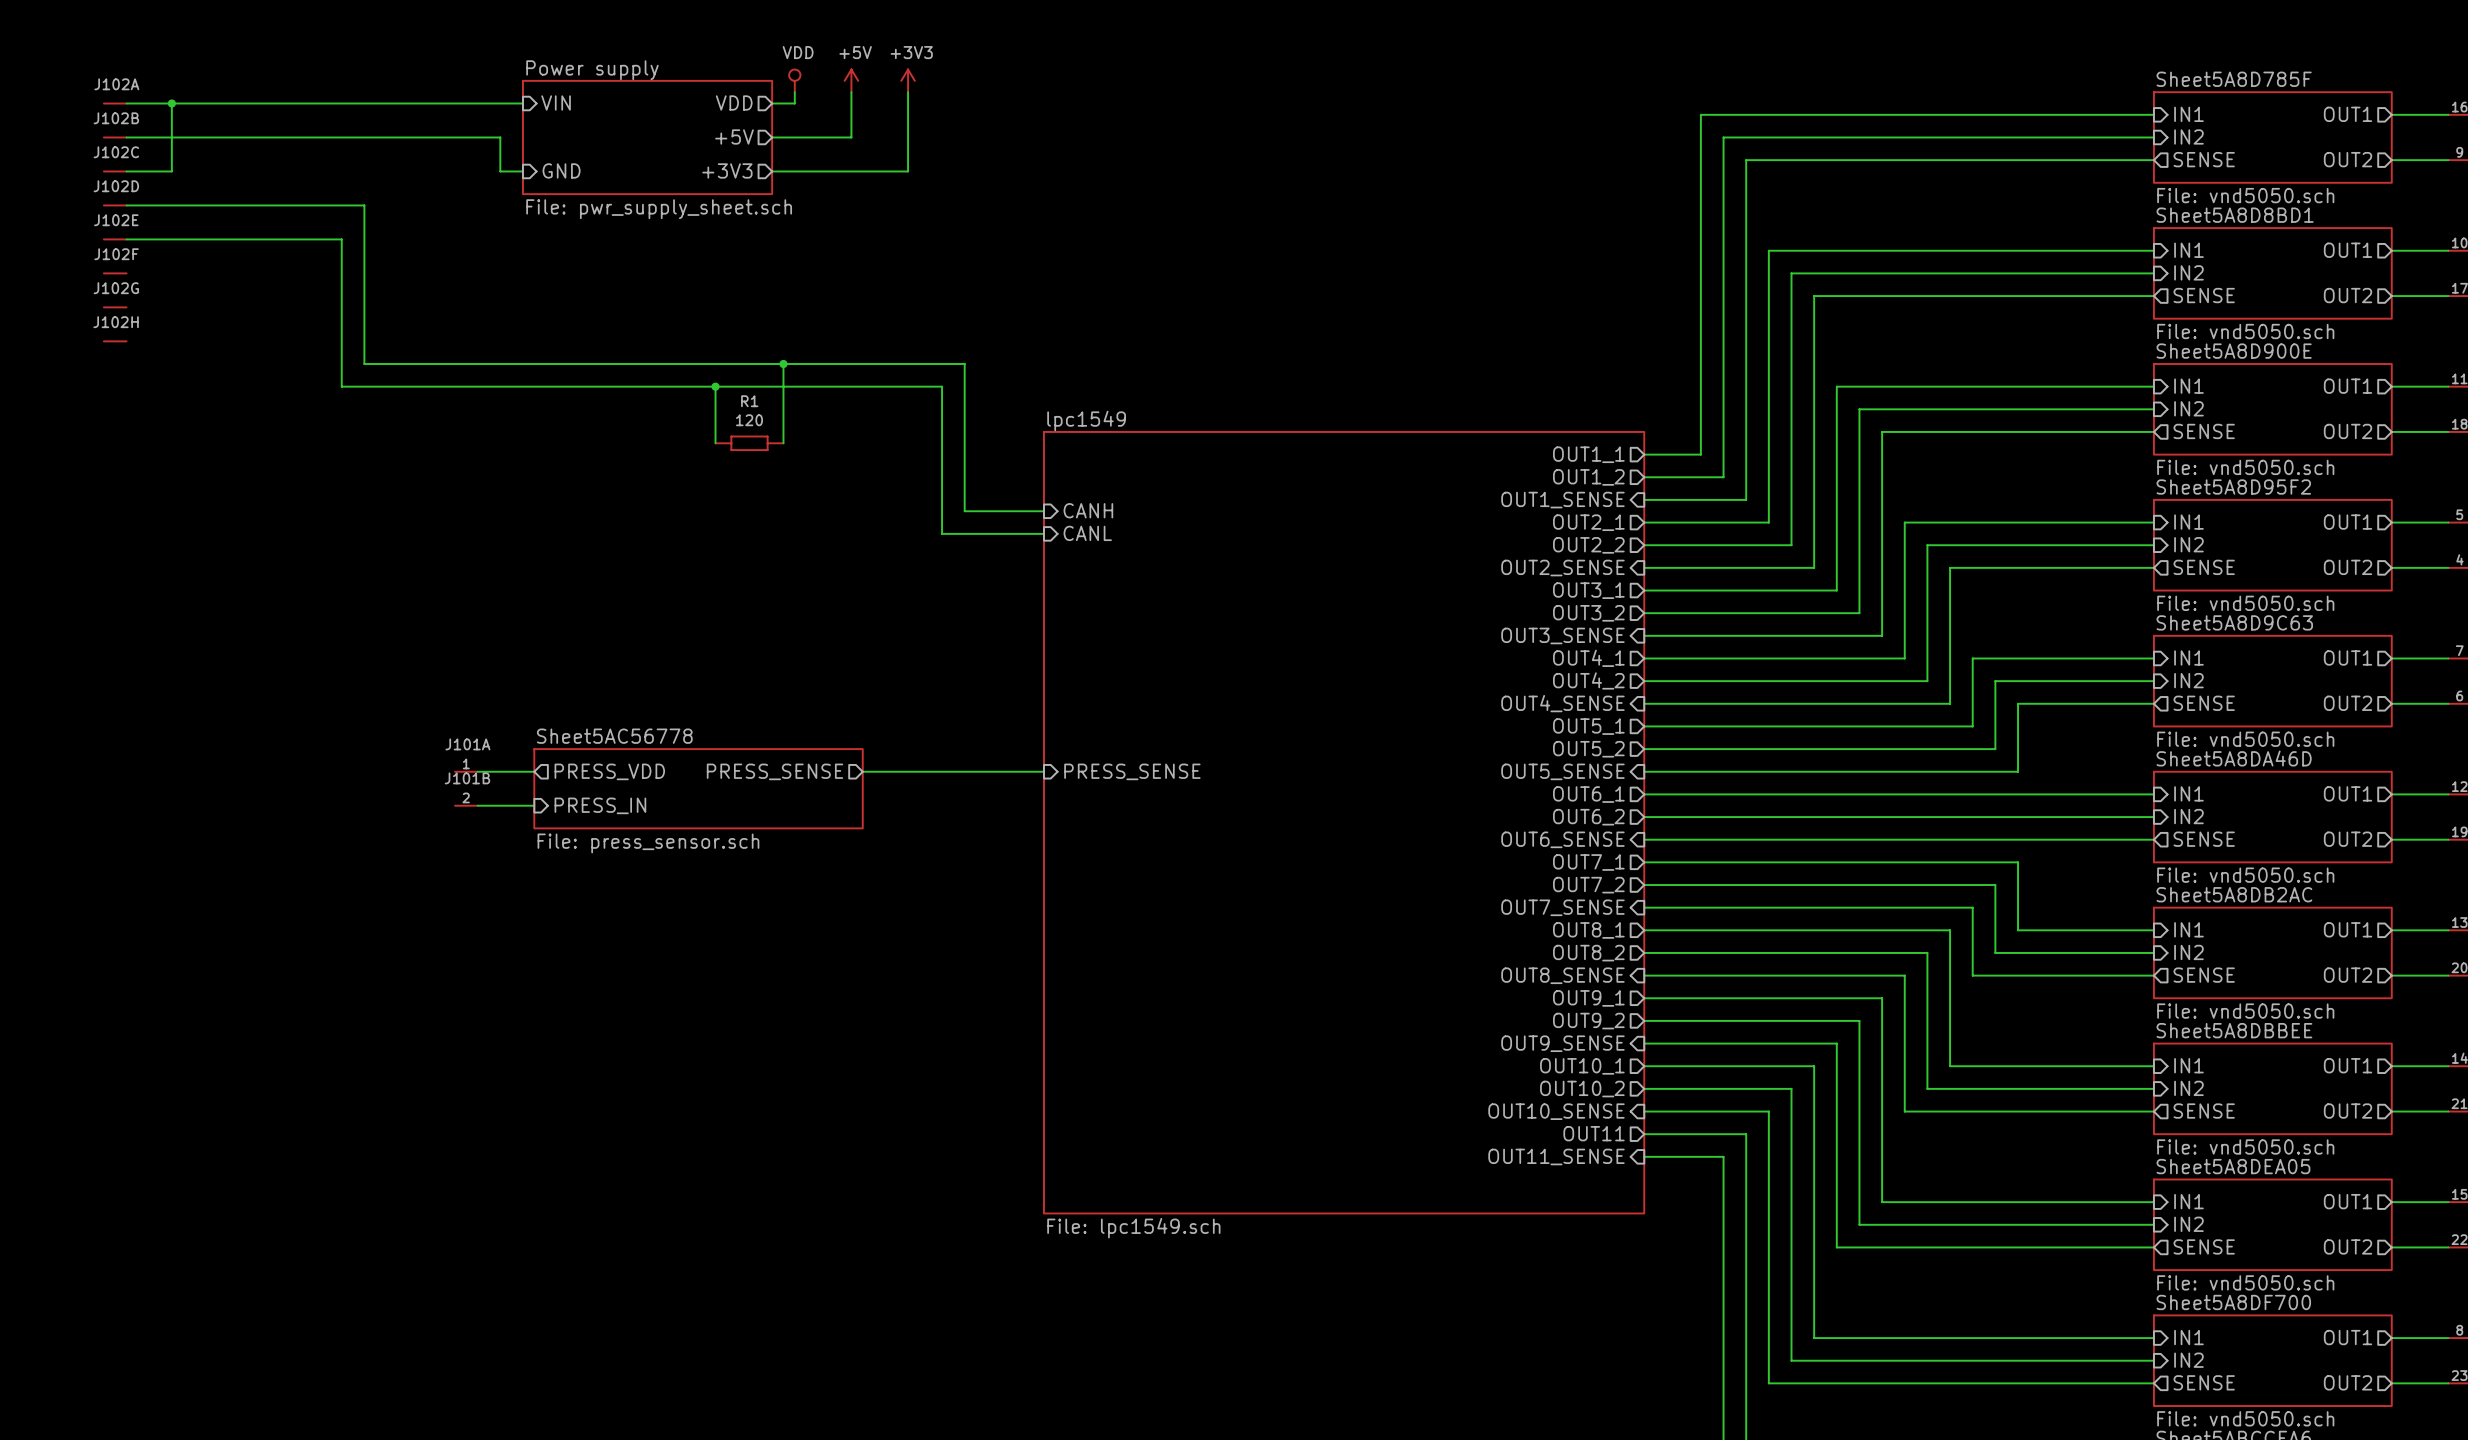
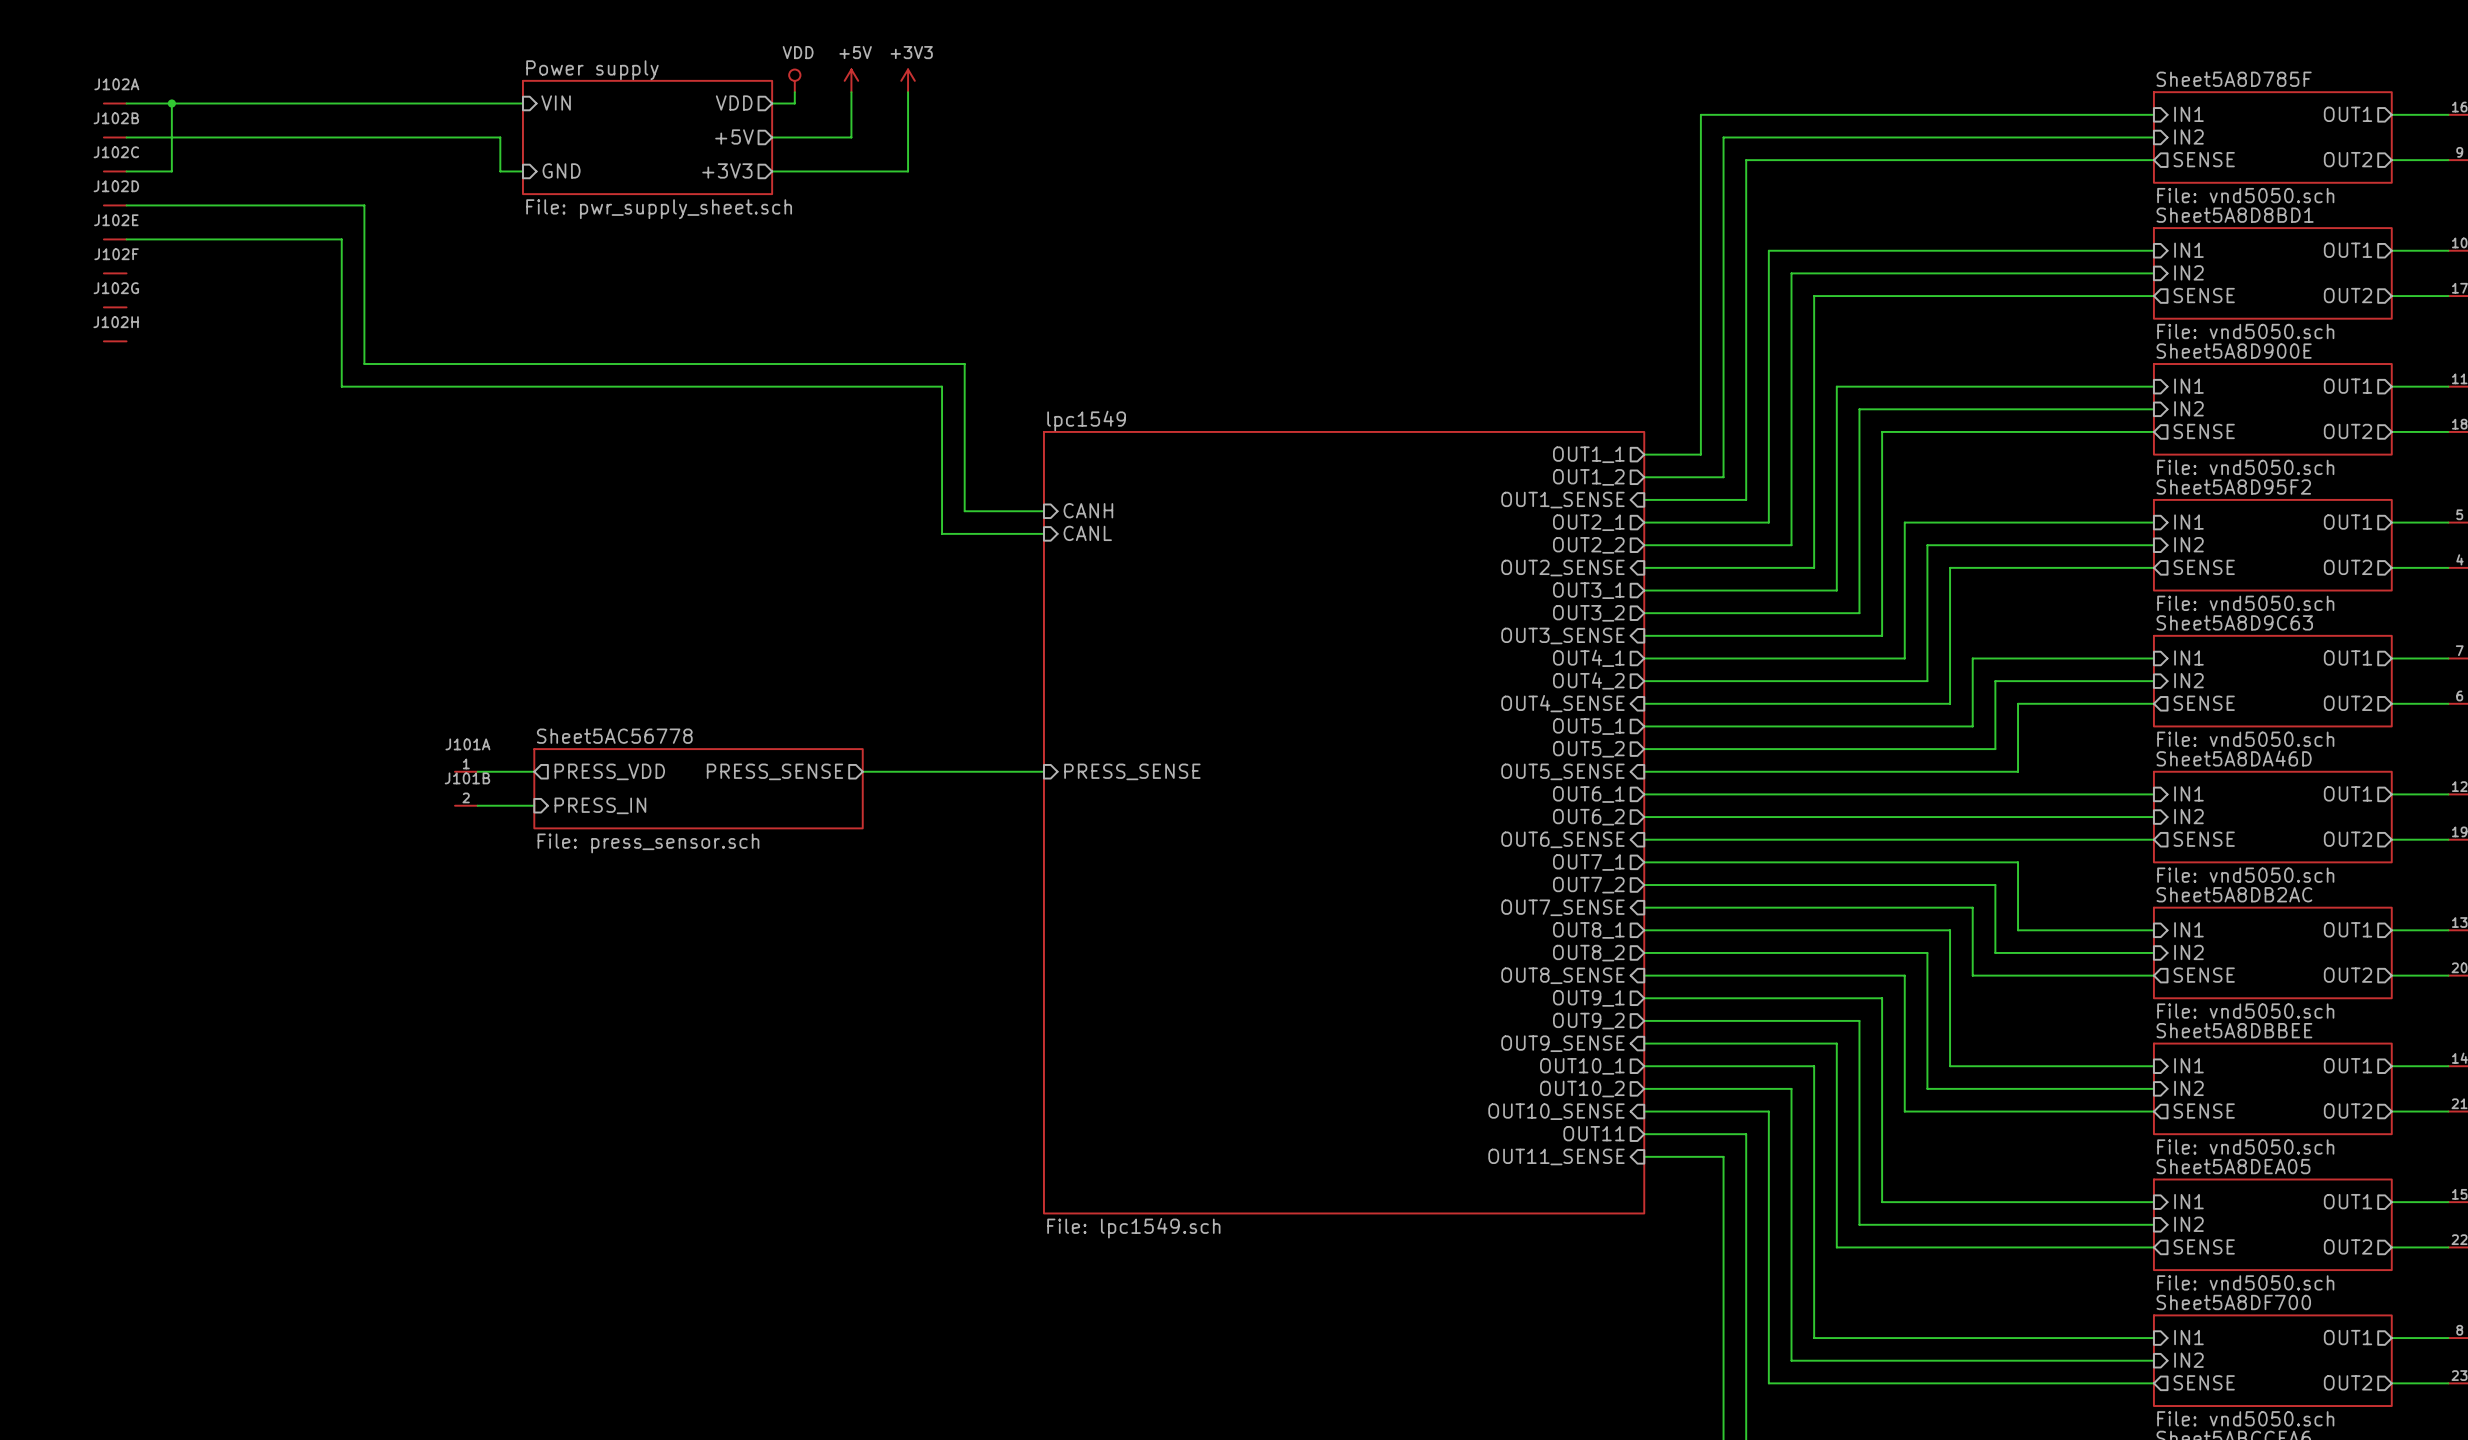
wire: (783, 364) (783, 443) -> none
junction: (783, 364) -> none
wire: (715, 386) (715, 443) -> none
junction: (715, 386) -> none
R1: 120 (749, 443) -> none

